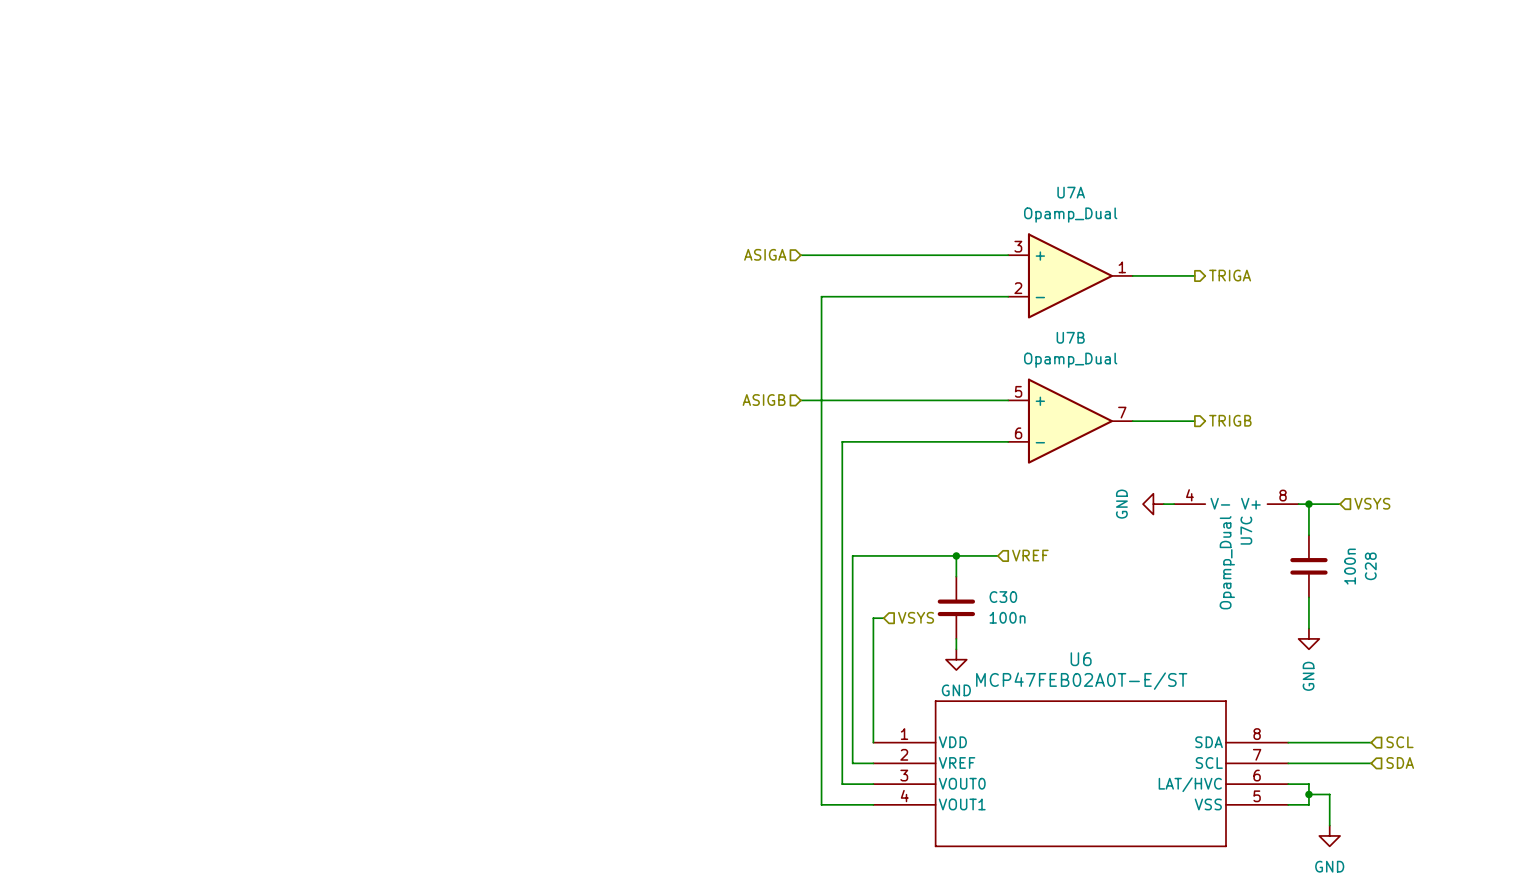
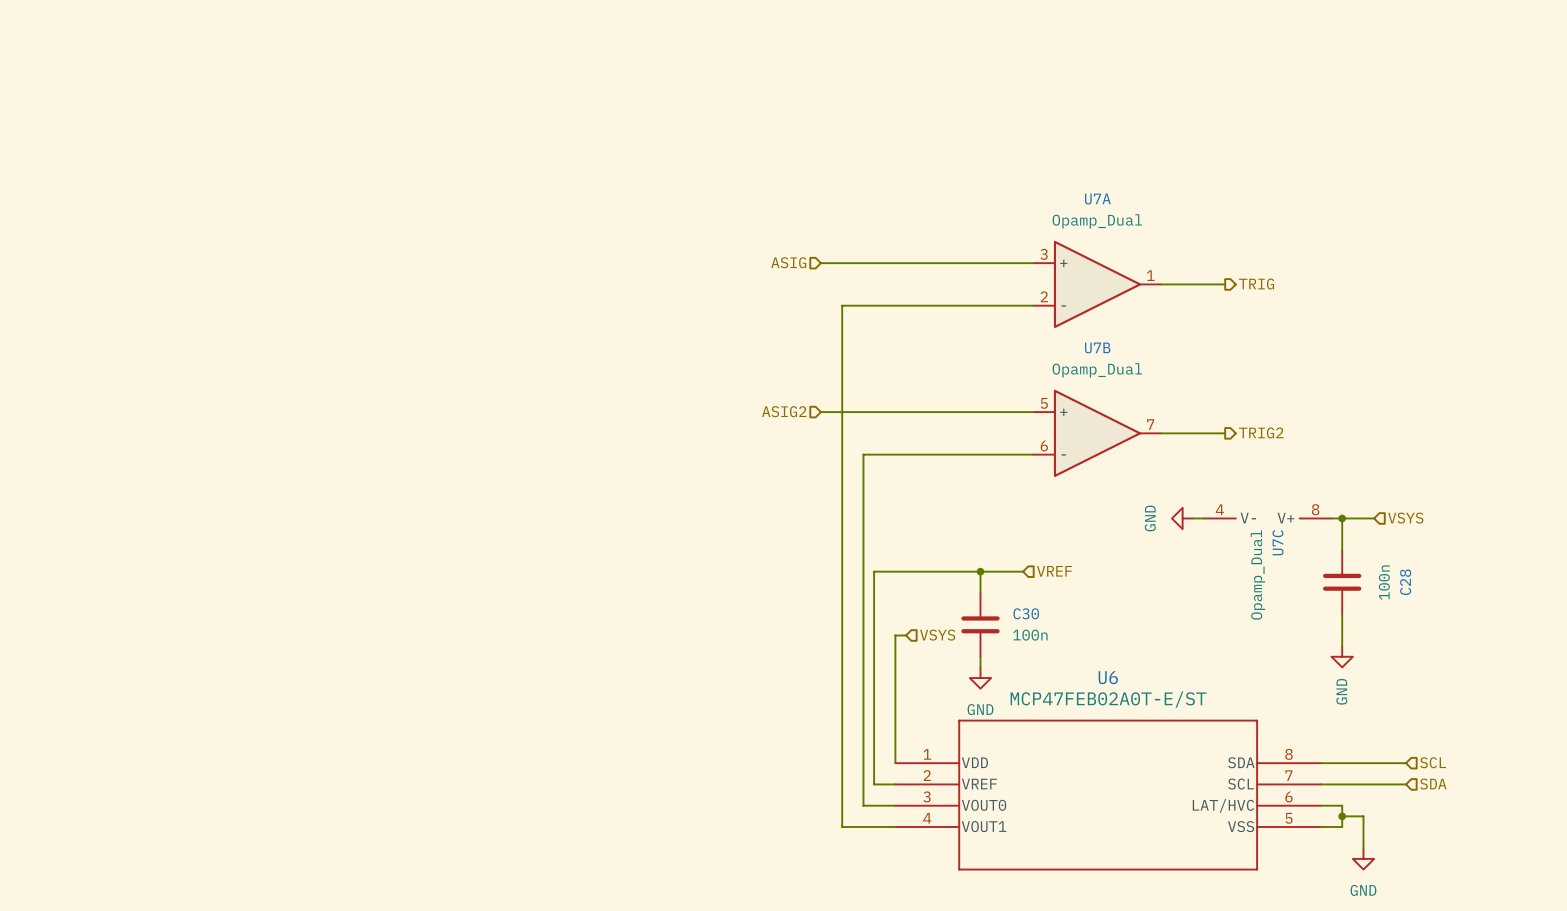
hierarchical label: ASIGA (765, 254) -> ASIG (788, 262)
hierarchical label: TRIGA (1230, 275) -> TRIG (1256, 284)
hierarchical label: ASIGB (764, 400) -> ASIG2 (784, 411)
hierarchical label: TRIGB (1230, 420) -> TRIG2 (1261, 432)

